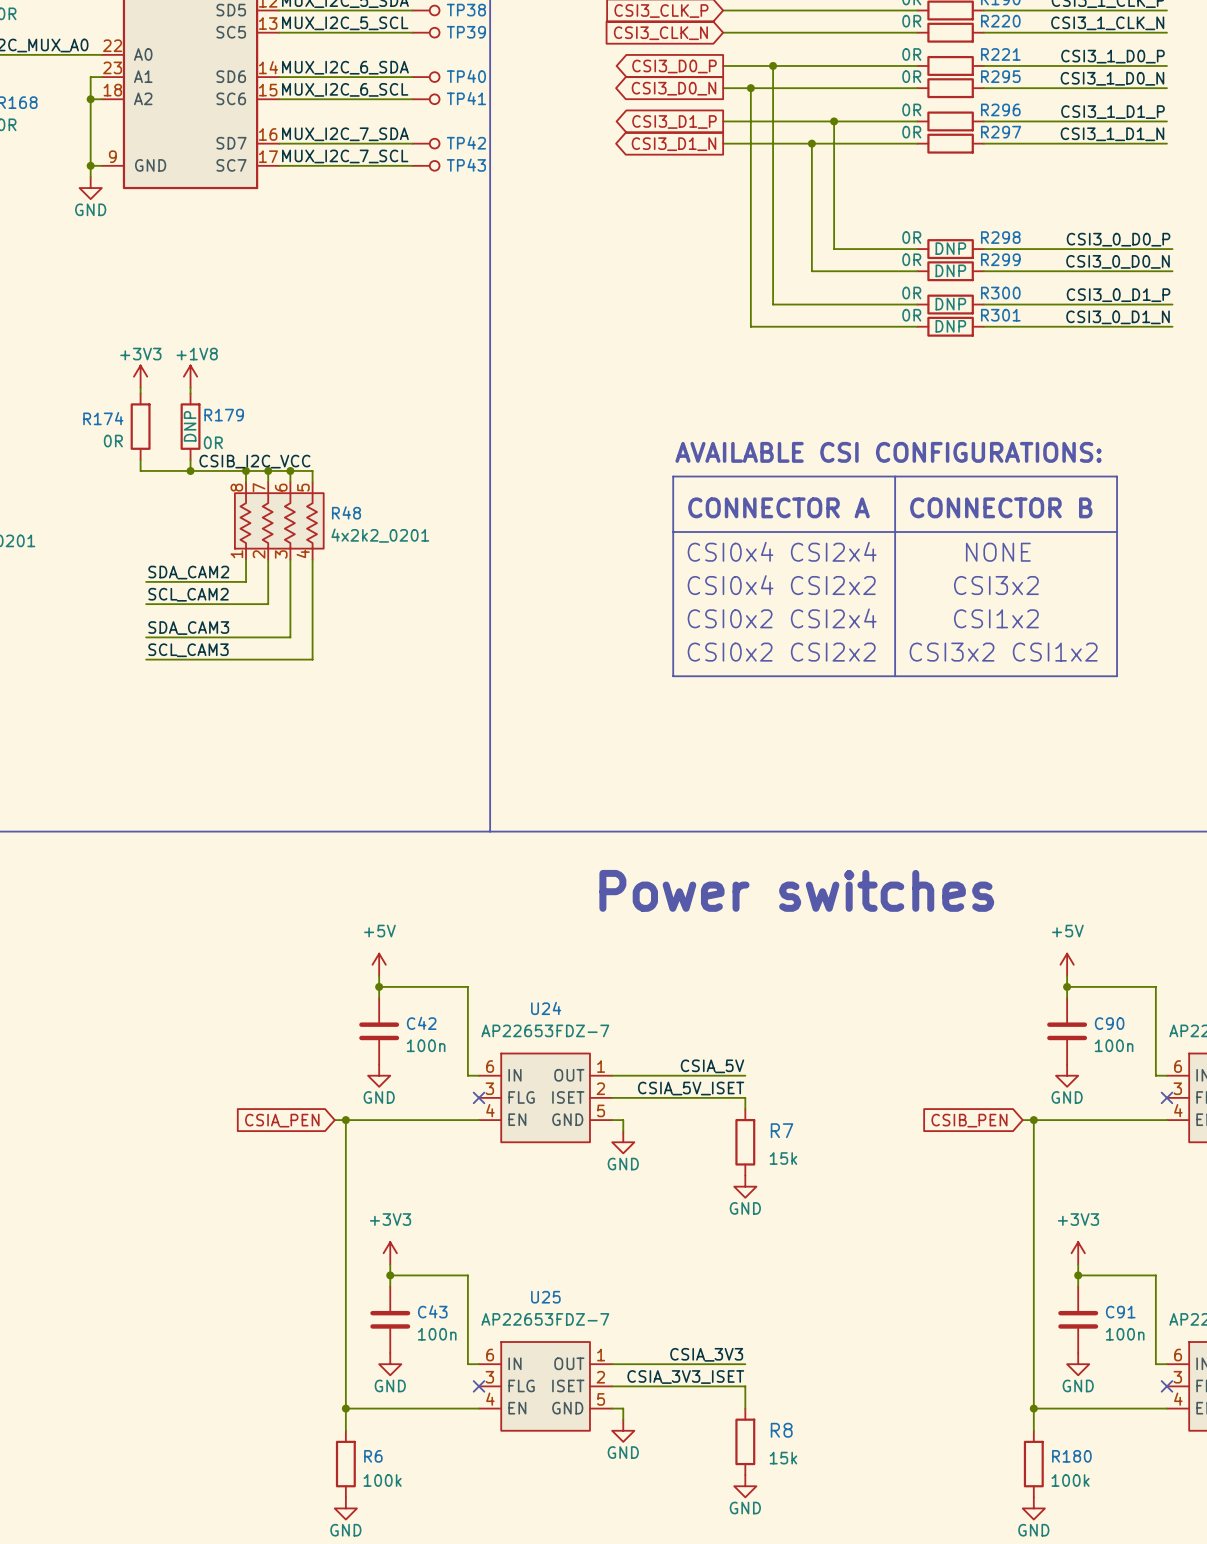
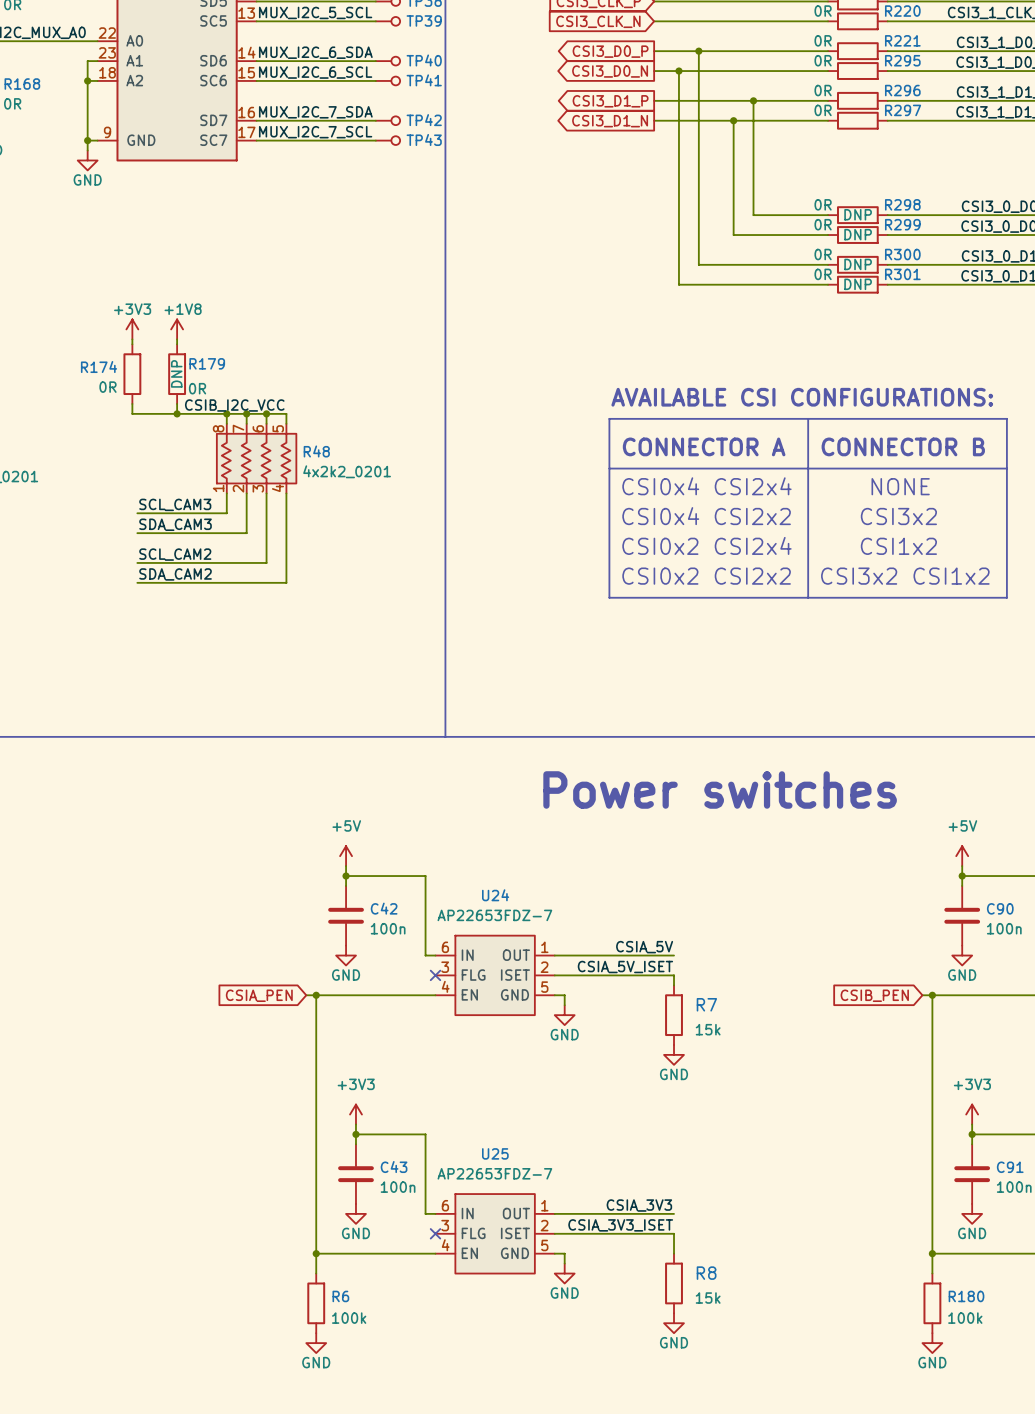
label: SDA_CAM2 (188, 572) -> SCL_CAM3 (175, 504)
label: SCL_CAM2 (188, 594) -> SDA_CAM3 (175, 524)
label: SDA_CAM3 (188, 628) -> SCL_CAM2 (175, 554)
label: SCL_CAM3 (188, 650) -> SDA_CAM2 (175, 574)

